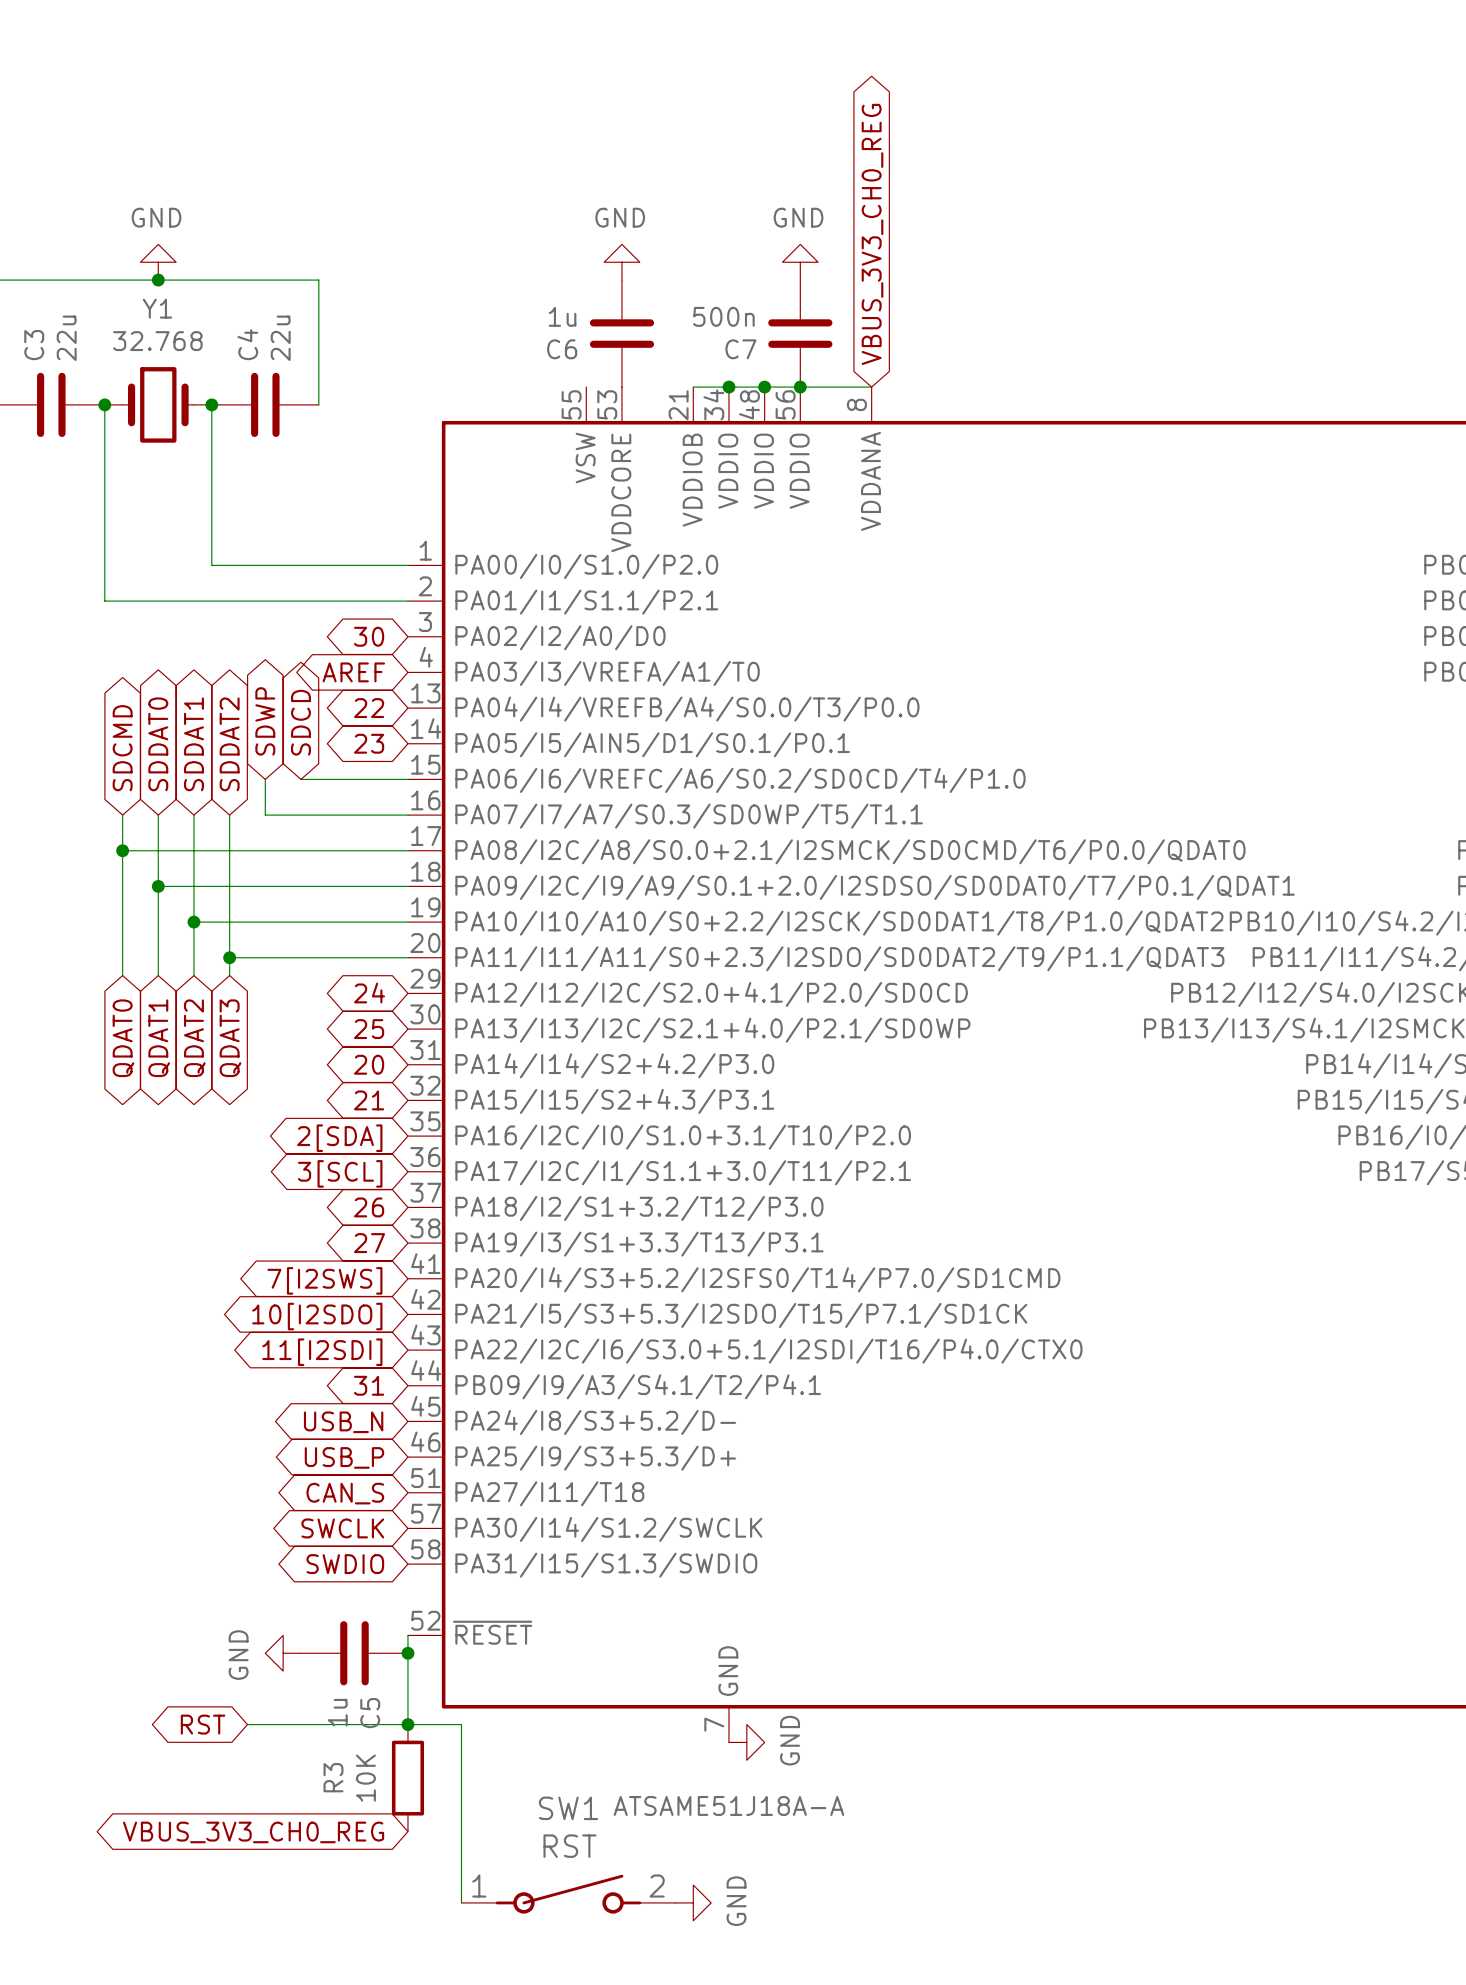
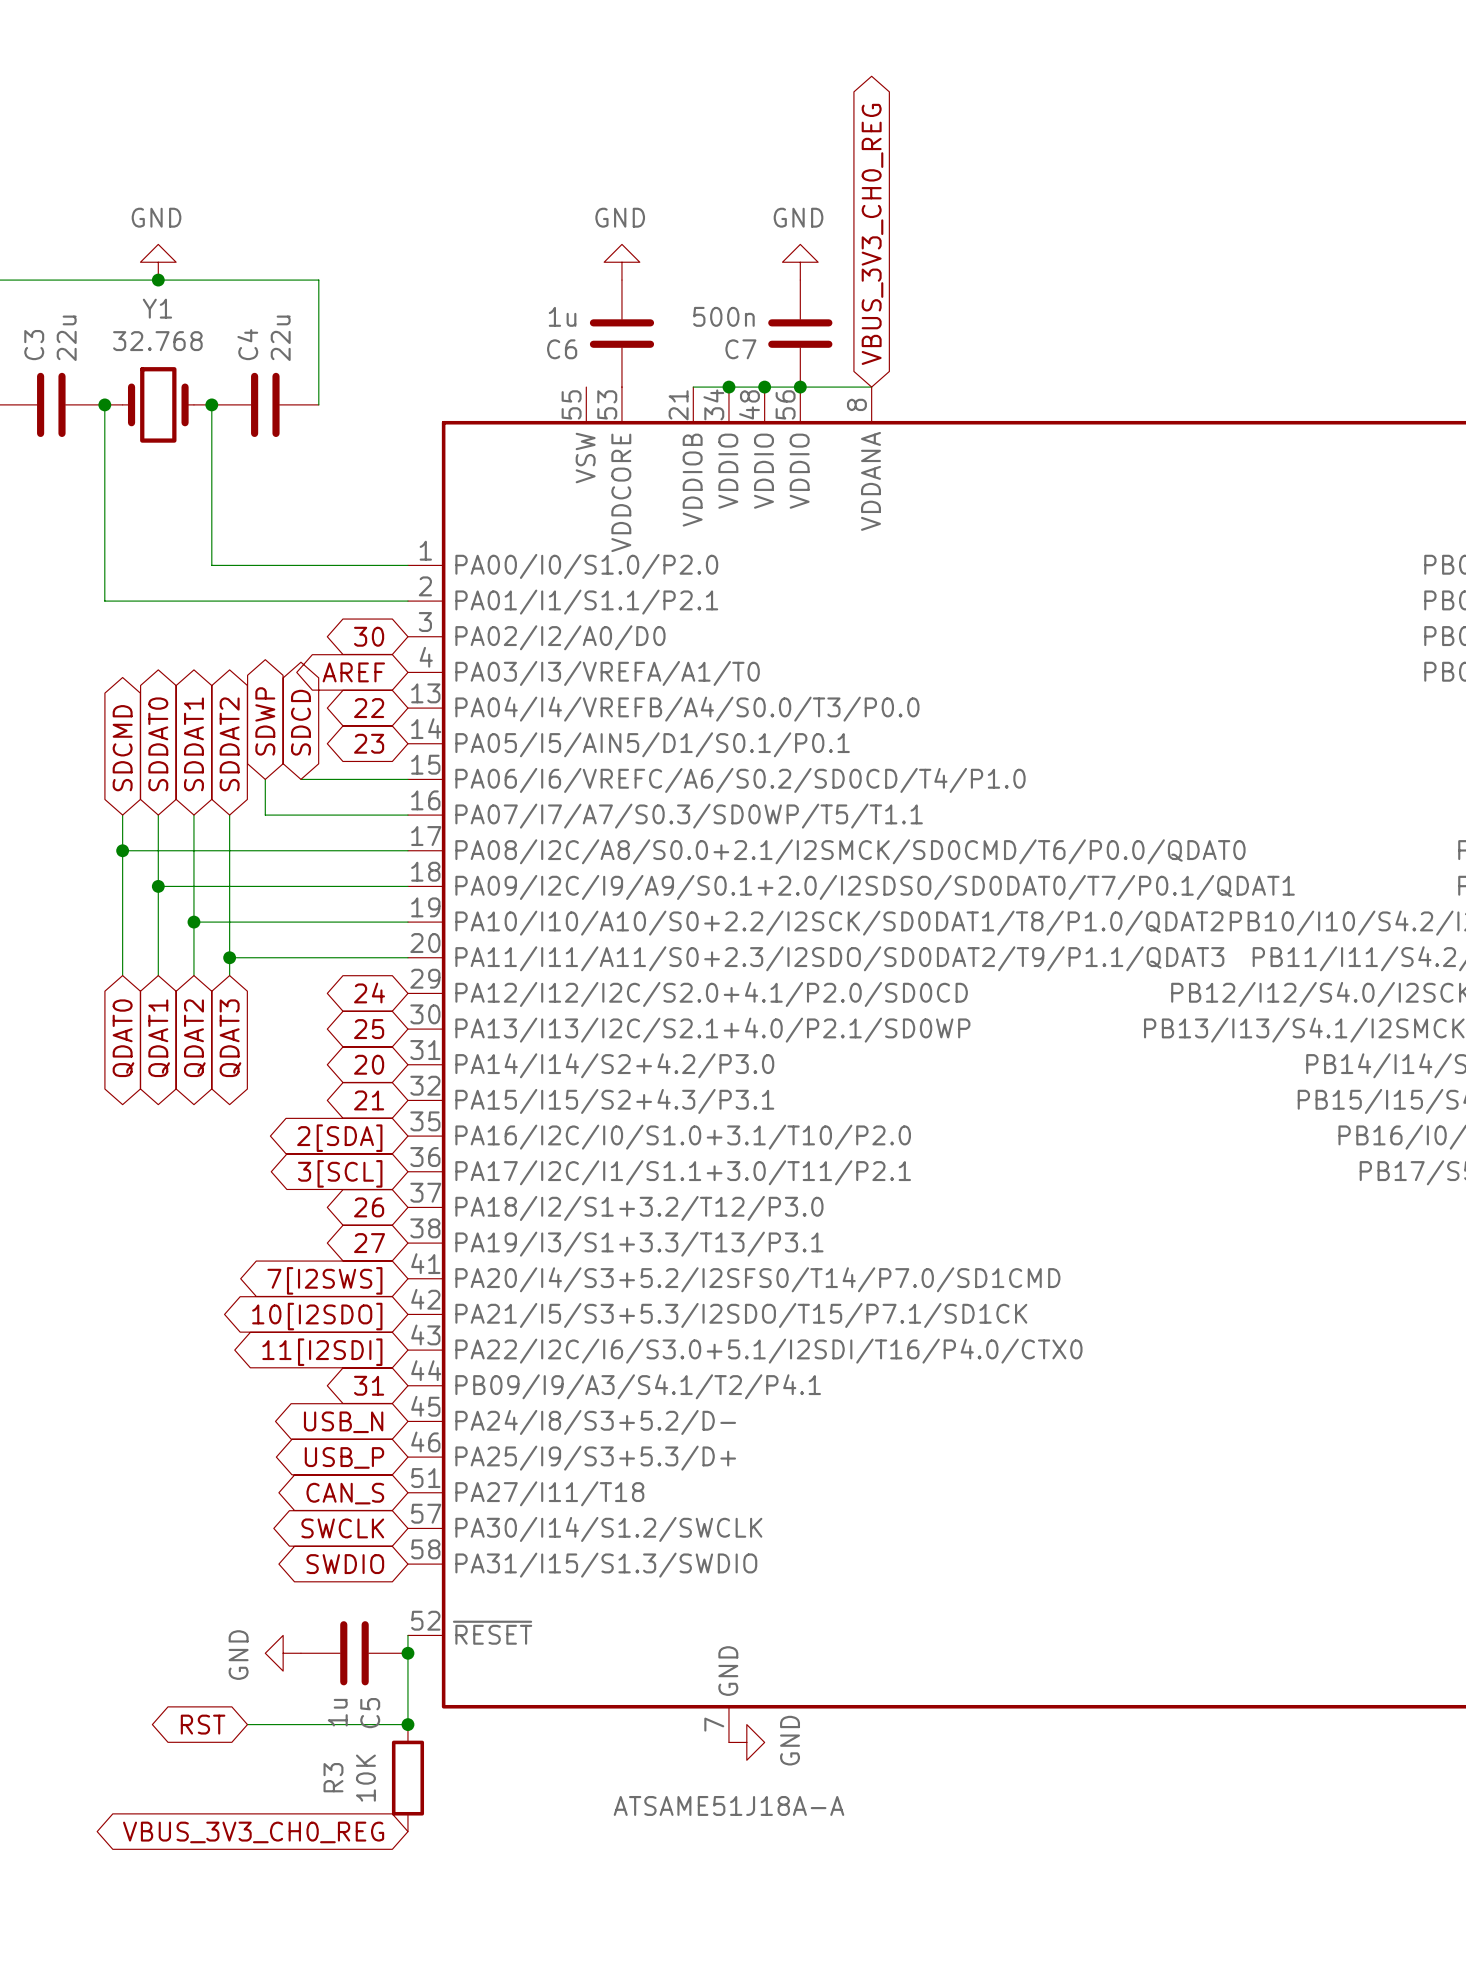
wire: (407, 1724) (461, 1724) (461, 1902) -> none
SW1: RST (568, 1894) -> none
power symbol: GND (693, 1902) -> none

